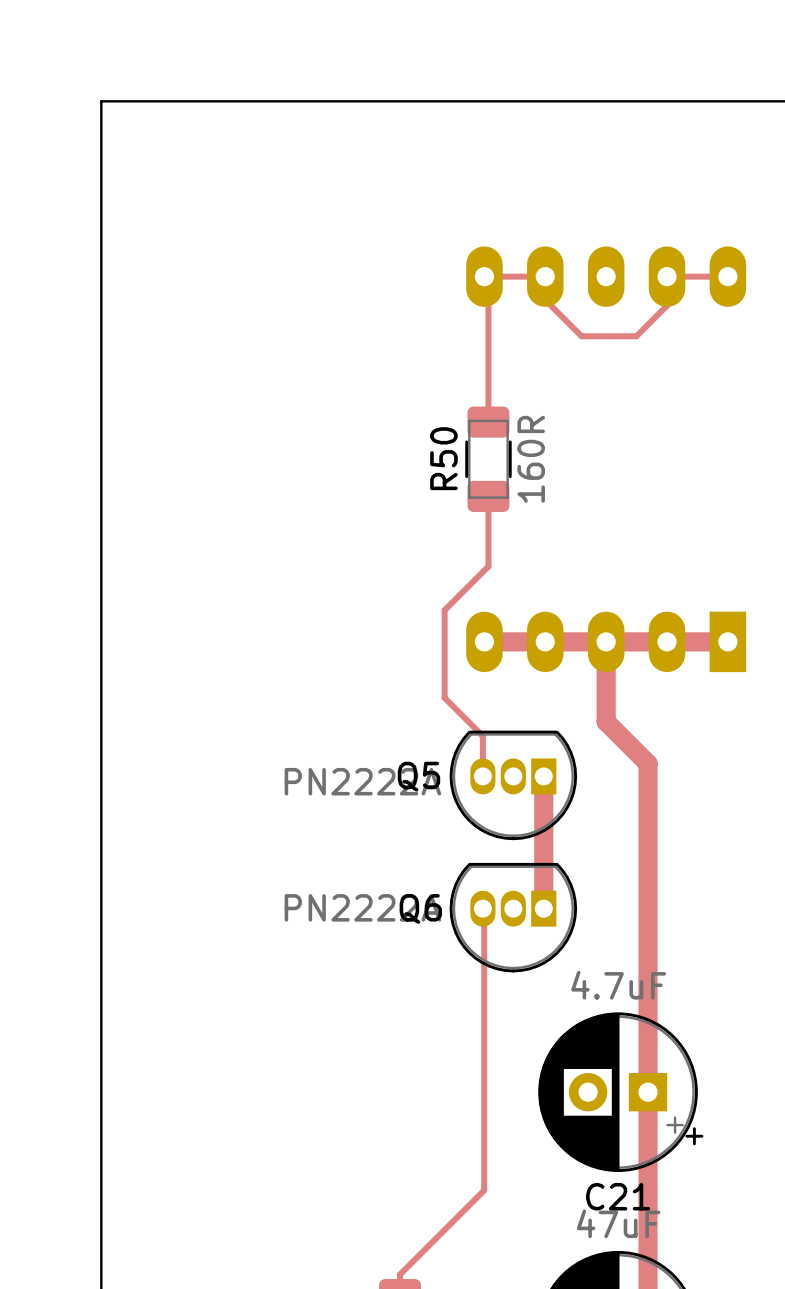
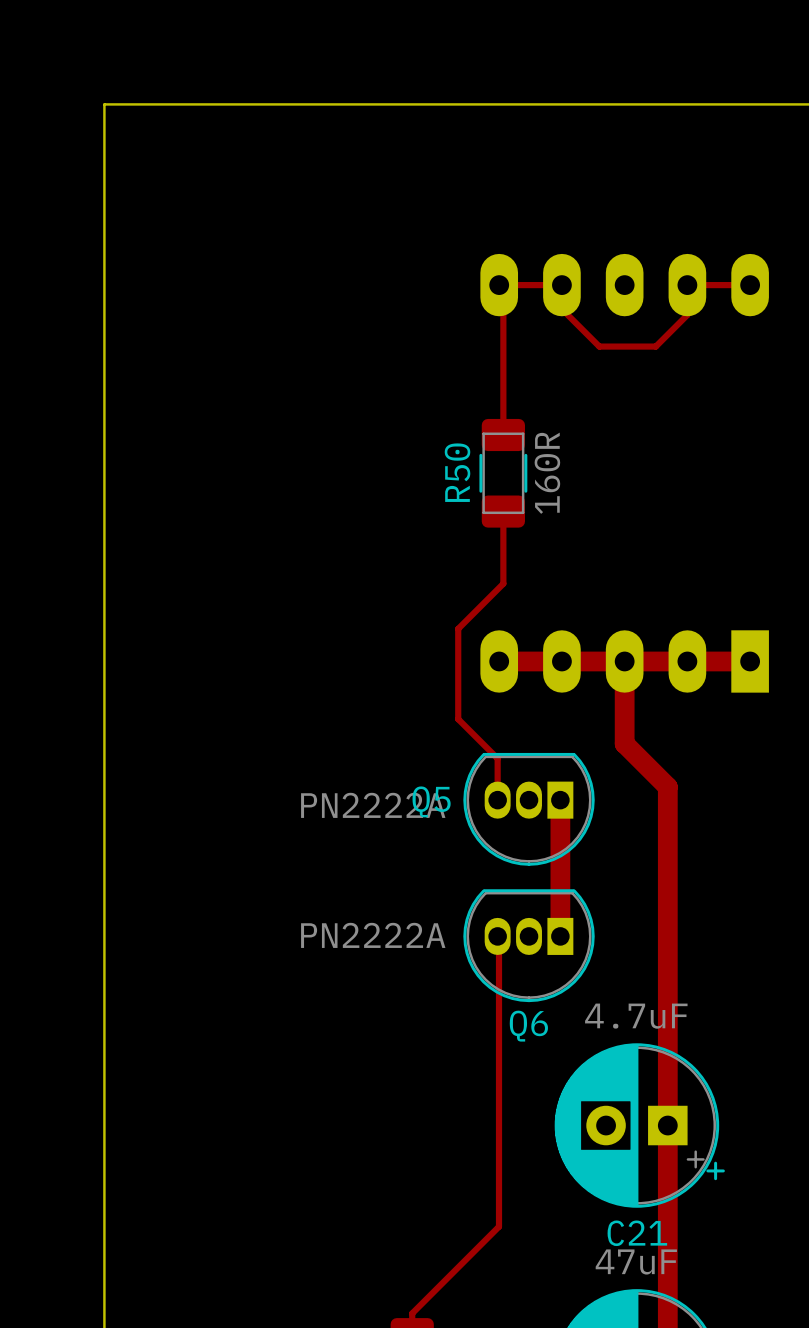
Q6 name position: Q6 (420, 908) -> Q6 (528, 1026)

